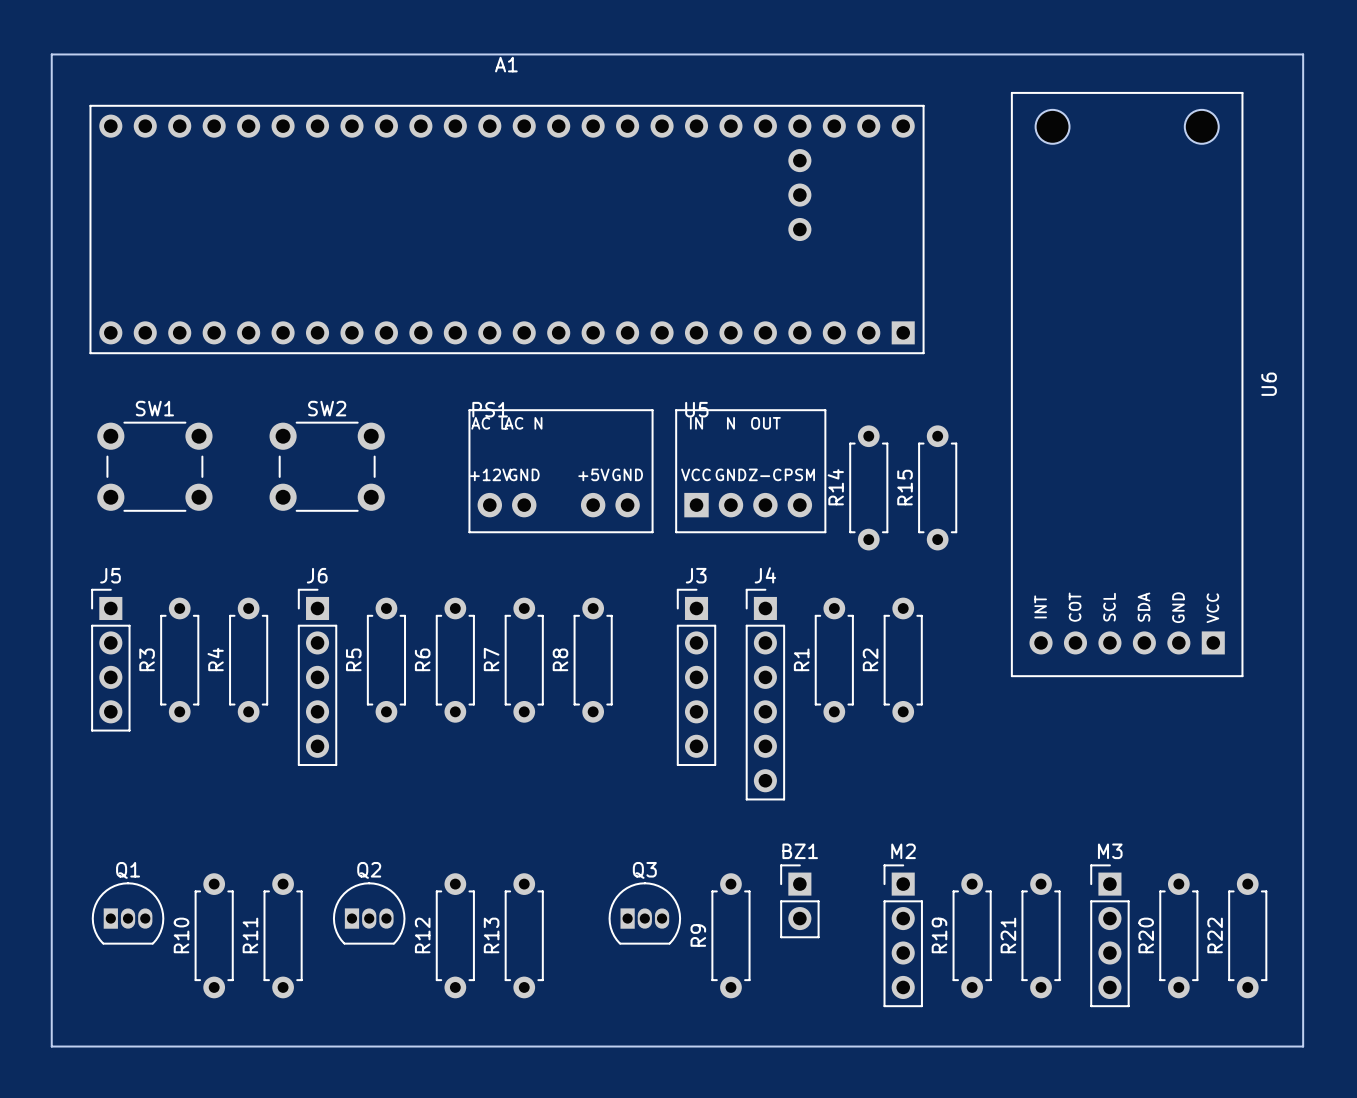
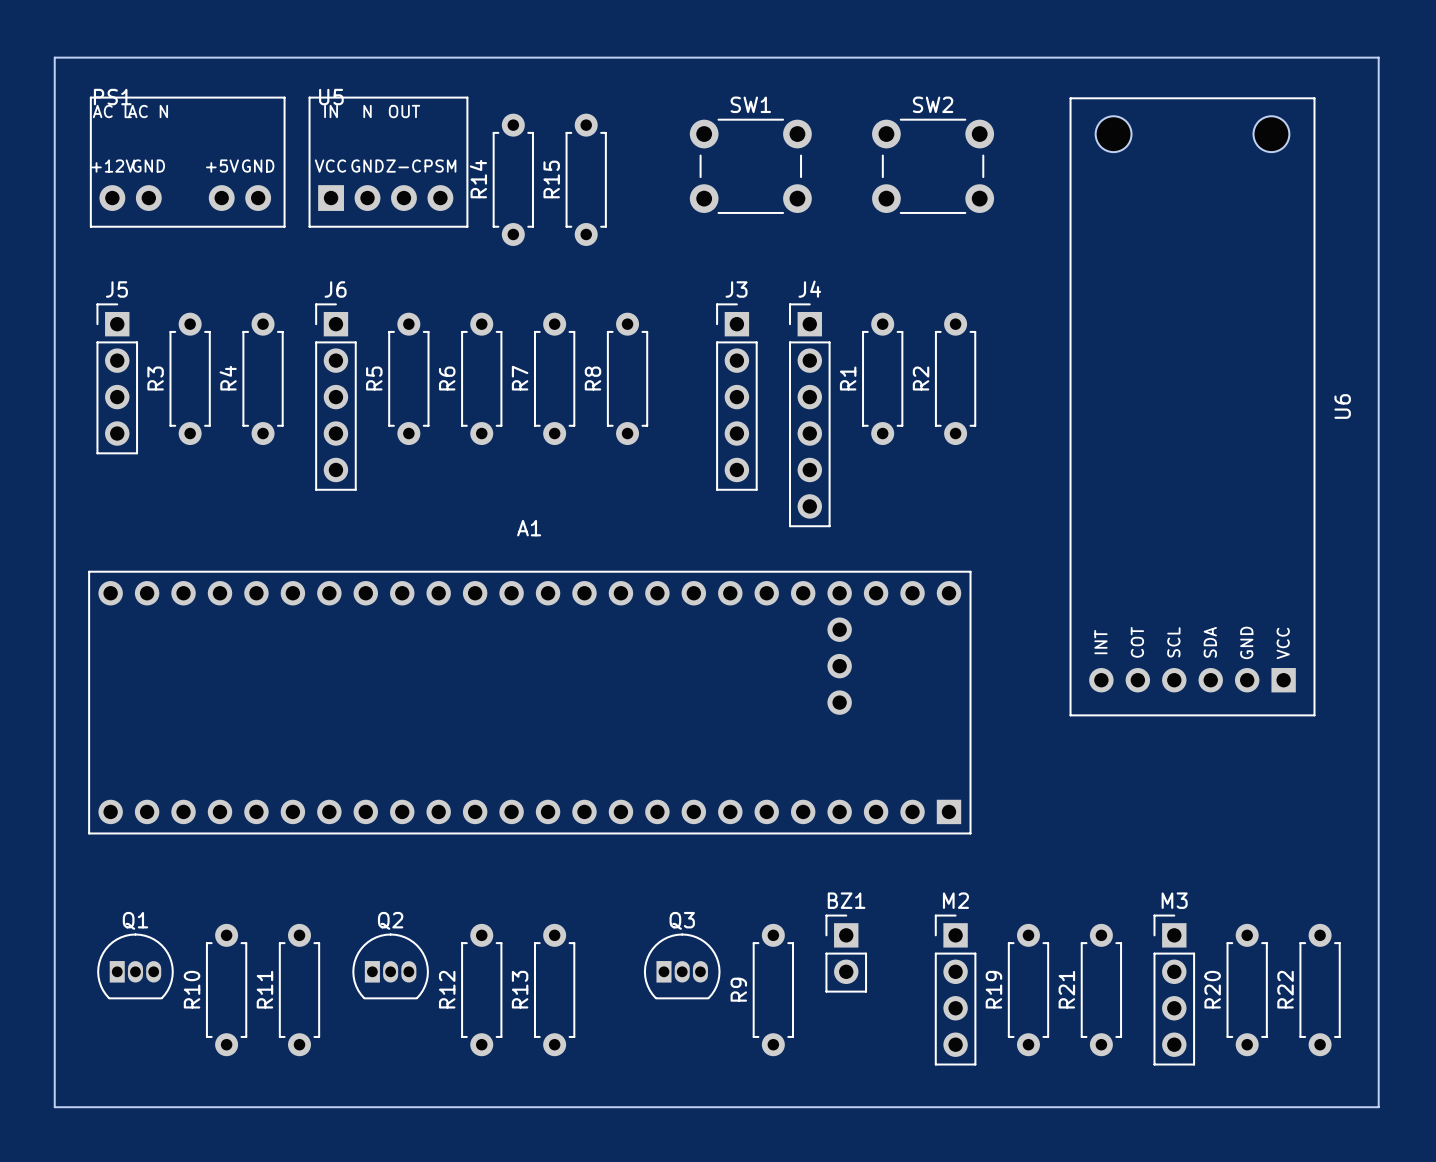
A1 position: (507, 229) -> (529, 702)
SW1 position: (154, 466) -> (750, 166)
SW2 position: (327, 466) -> (933, 166)
PS1 position: (561, 471) -> (187, 162)
U5 position: (750, 471) -> (388, 162)
R14 position: (868, 487) -> (513, 179)
R15 position: (937, 487) -> (586, 179)
J5 position: (110, 660) -> (117, 378)
R3 position: (179, 660) -> (190, 378)
R4 position: (248, 660) -> (263, 378)
R5 position: (386, 660) -> (408, 378)
R6 position: (455, 660) -> (481, 378)
R7 position: (524, 660) -> (554, 378)
R8 position: (593, 660) -> (627, 378)
R1 position: (834, 660) -> (882, 378)
R2 position: (903, 660) -> (955, 378)
J6 position: (317, 677) -> (335, 397)
J3 position: (696, 677) -> (736, 397)
J4 position: (765, 694) -> (809, 415)

